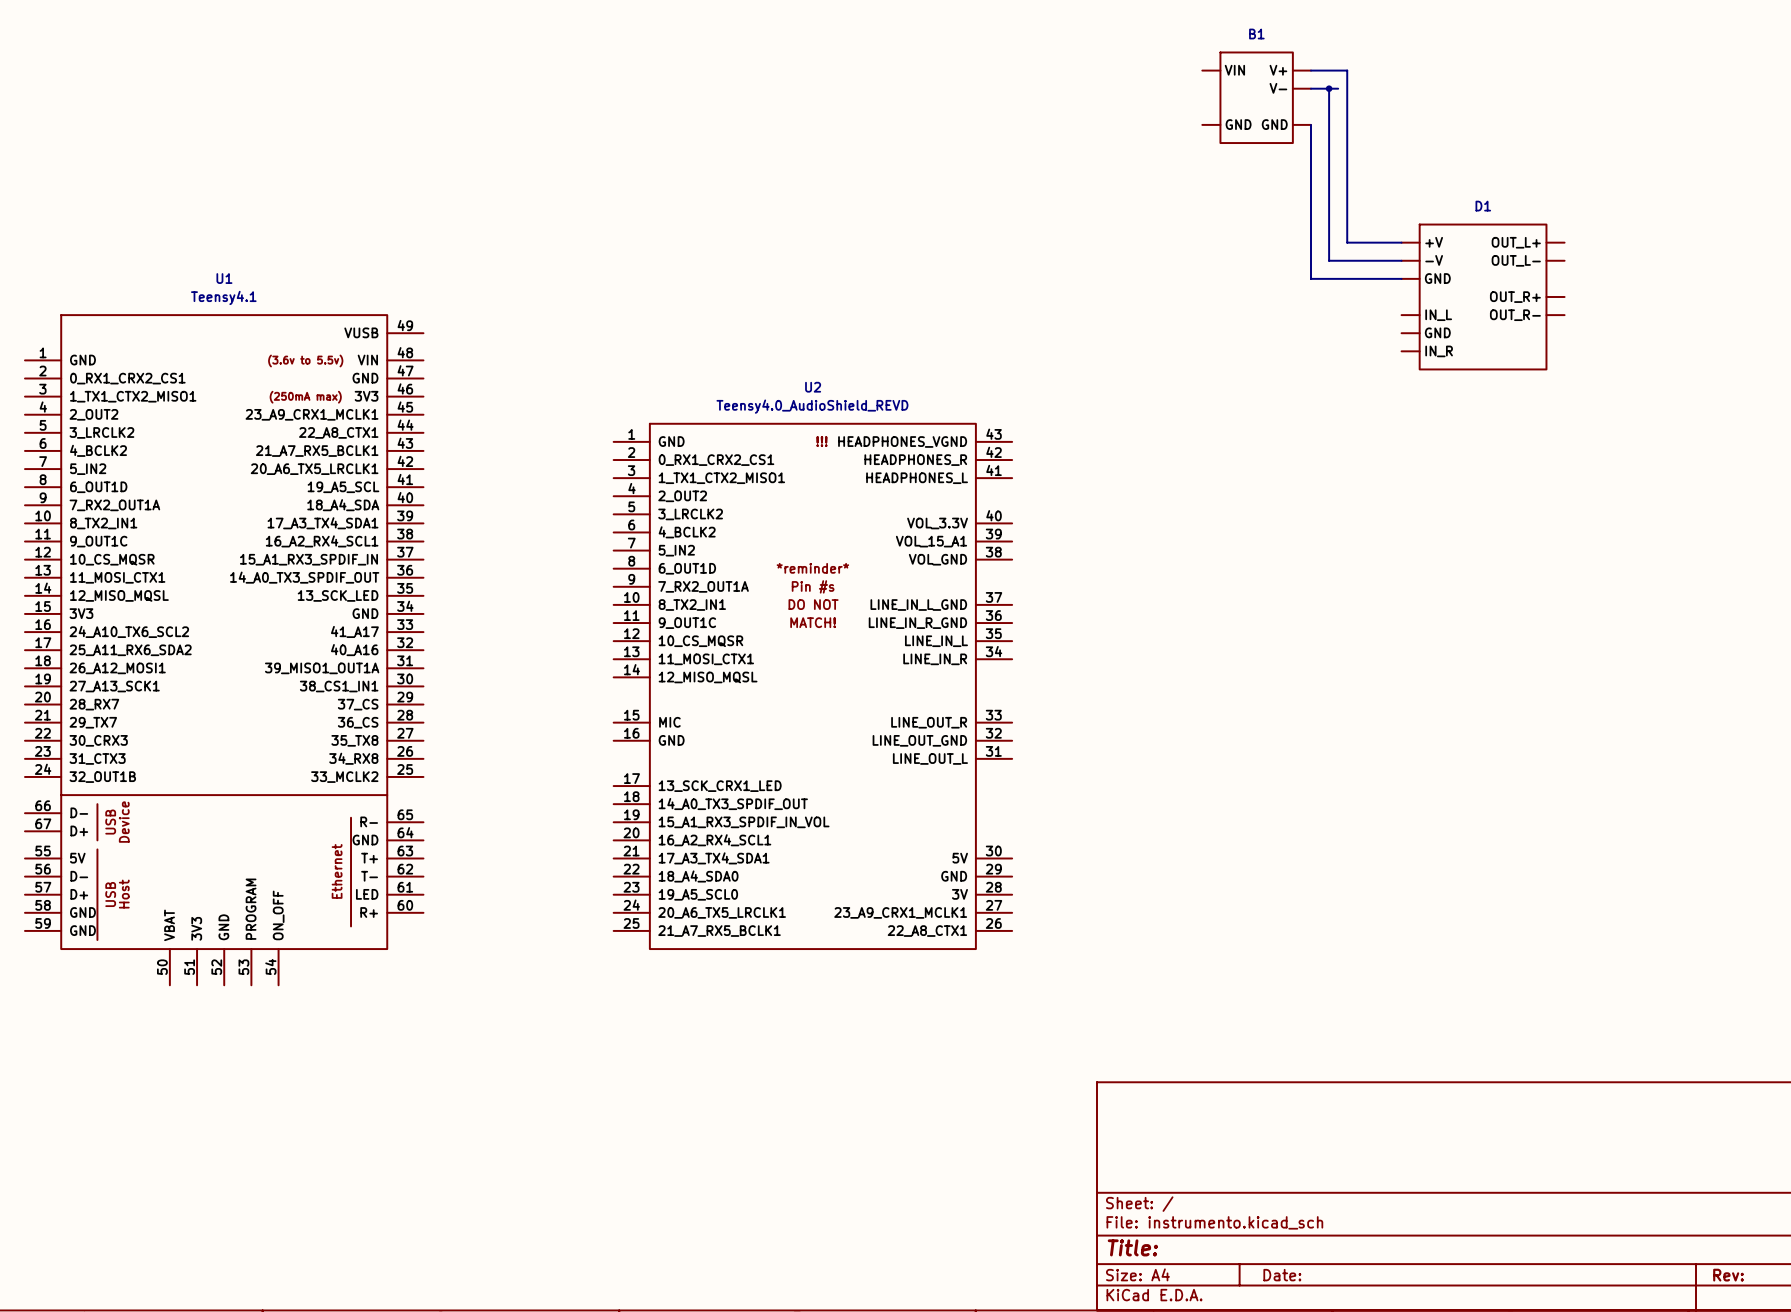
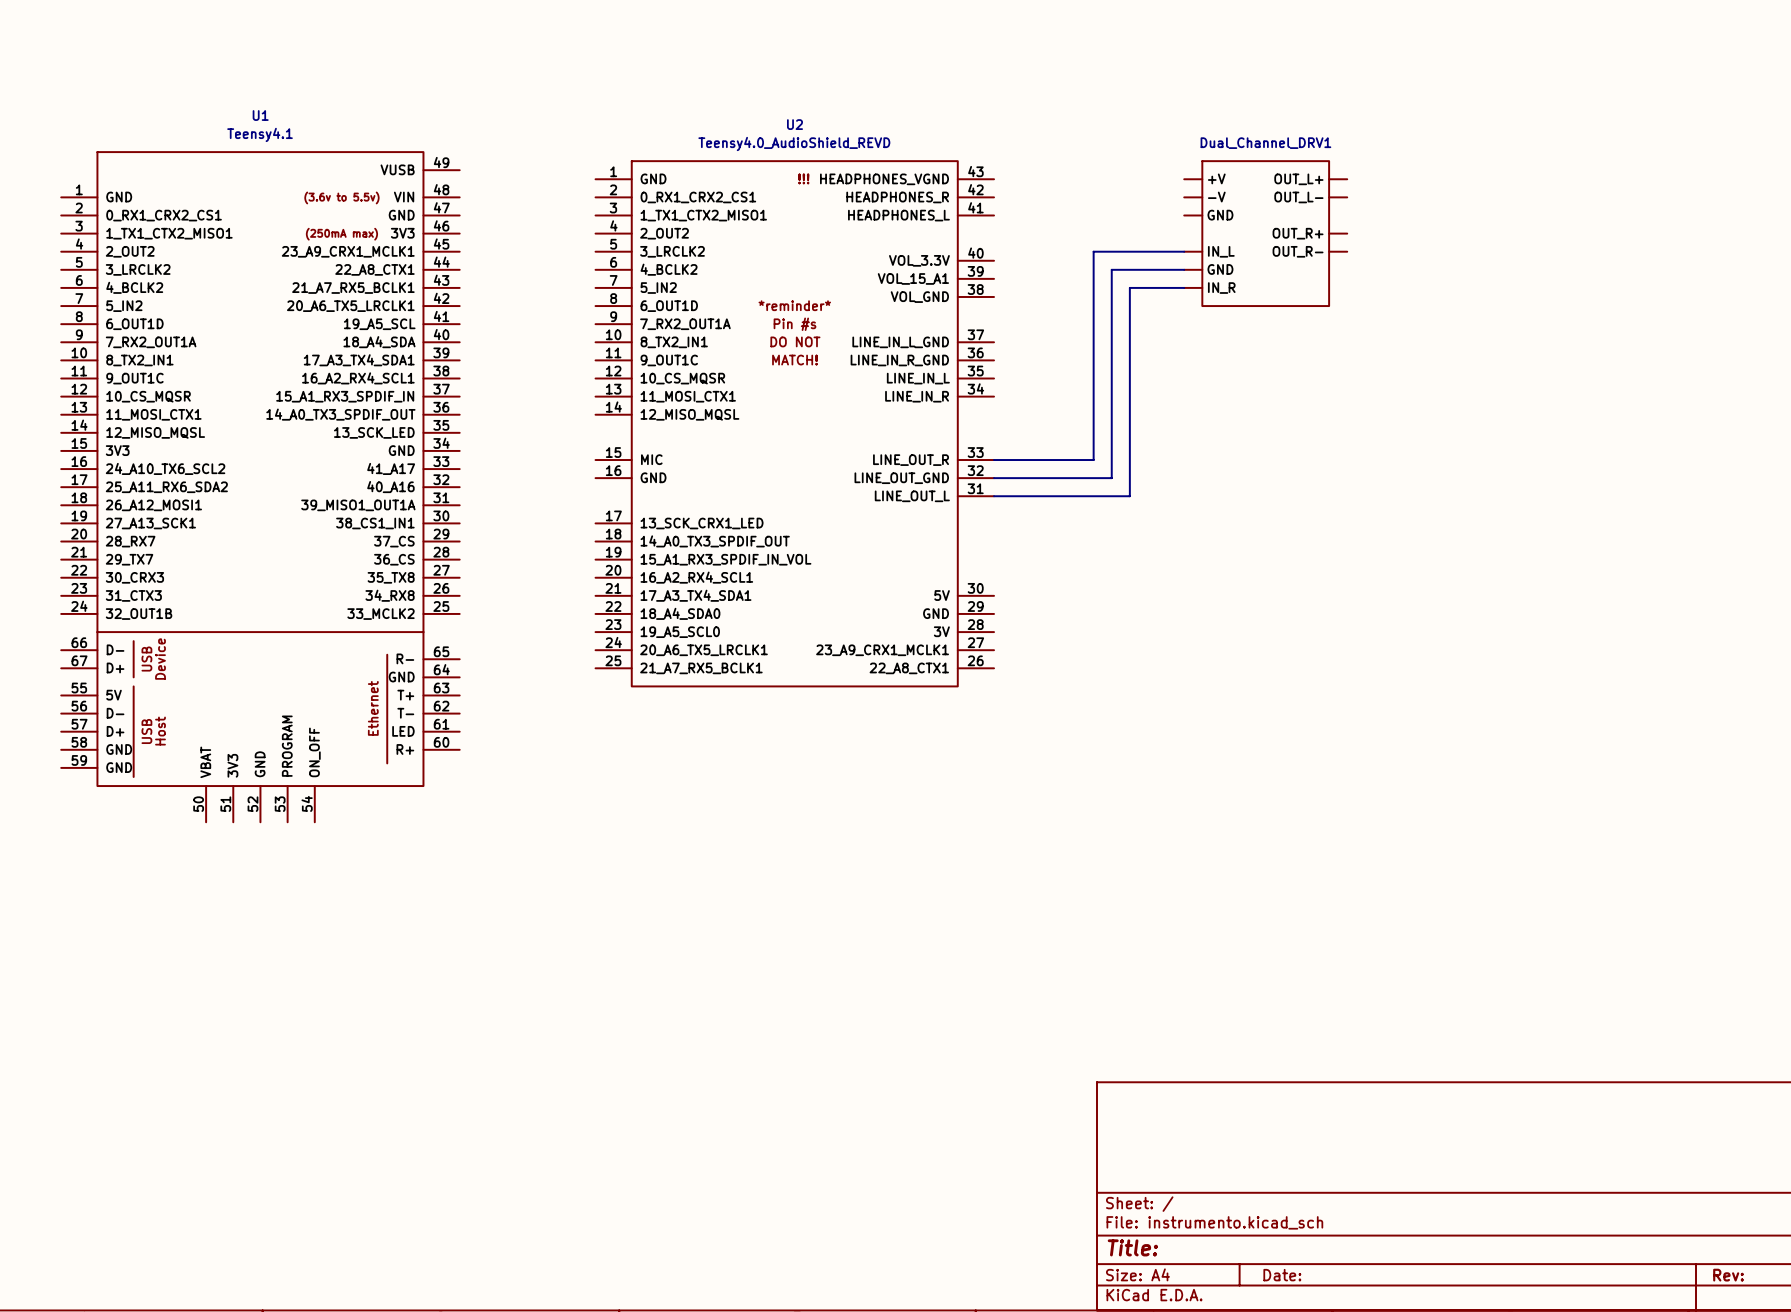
wire: (1311, 70) (1347, 70) (1347, 242) (1401, 242) -> none
wire: (1311, 88) (1338, 88) -> none
wire: (1329, 88) (1329, 260) (1401, 260) -> none
junction: (1329, 88) -> none
B1: (1256, 97) -> none
wire: (1311, 124) (1311, 278) (1401, 278) -> none
Dual_Channel_DRV1: none -> (1265, 233)
wire: none -> (1184, 251) (1093, 251) (1093, 460) (994, 460)
wire: none -> (1184, 269) (1111, 269) (1111, 478) (994, 478)
wire: none -> (1184, 287) (1129, 287) (1129, 496) (994, 496)
D1: (1483, 296) -> none
U1 position: (224, 650) -> (260, 487)
U2 position: (812, 686) -> (794, 423)

